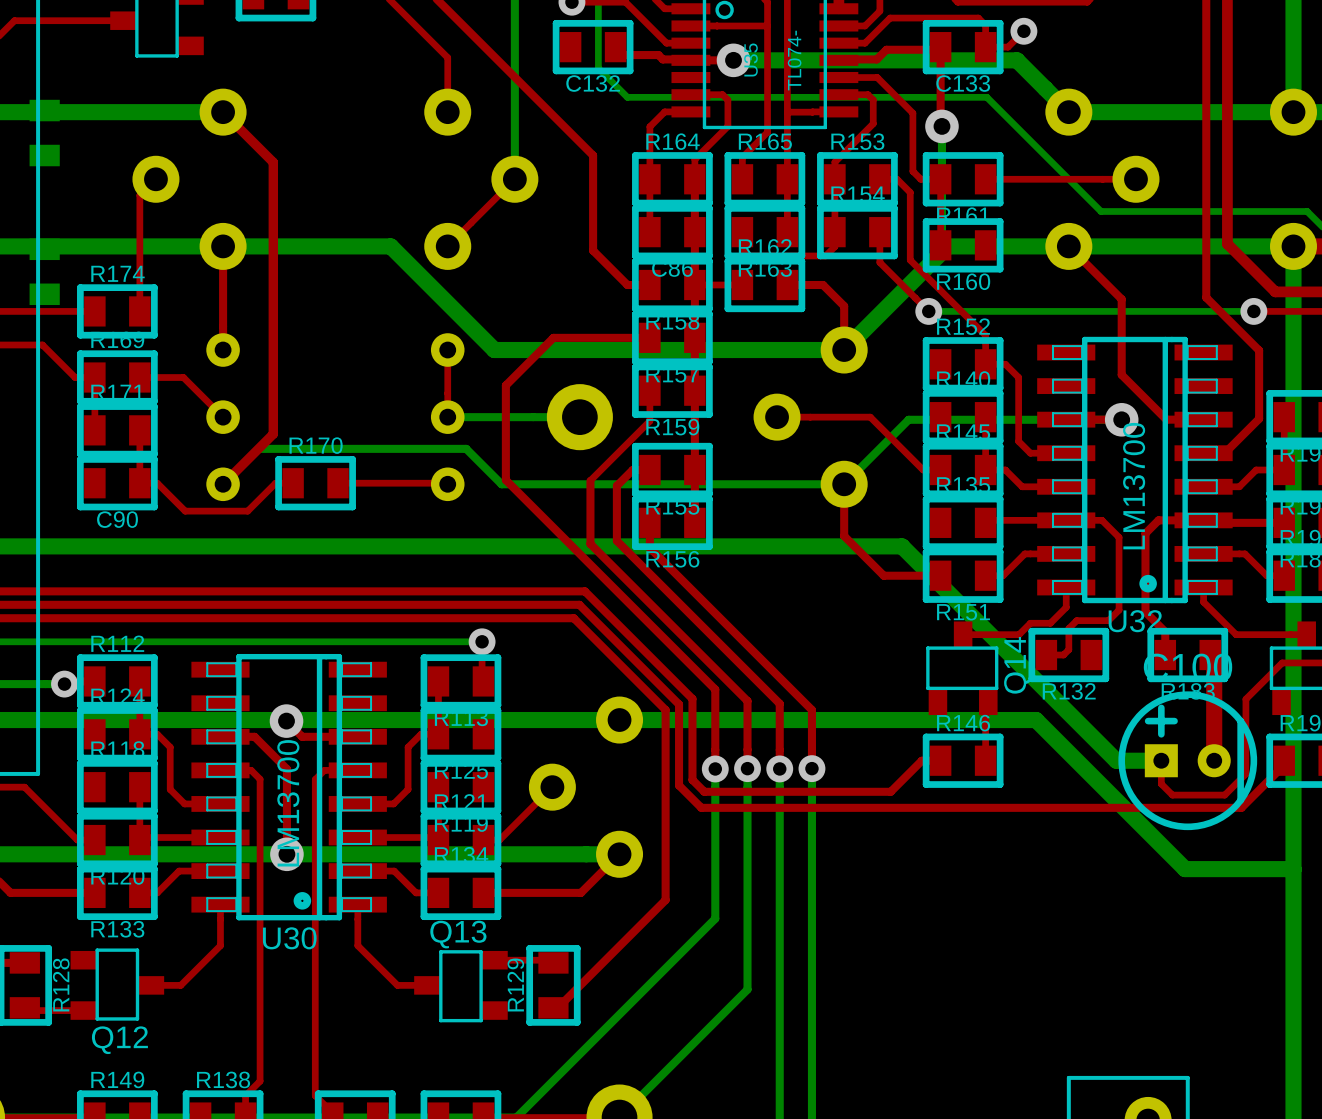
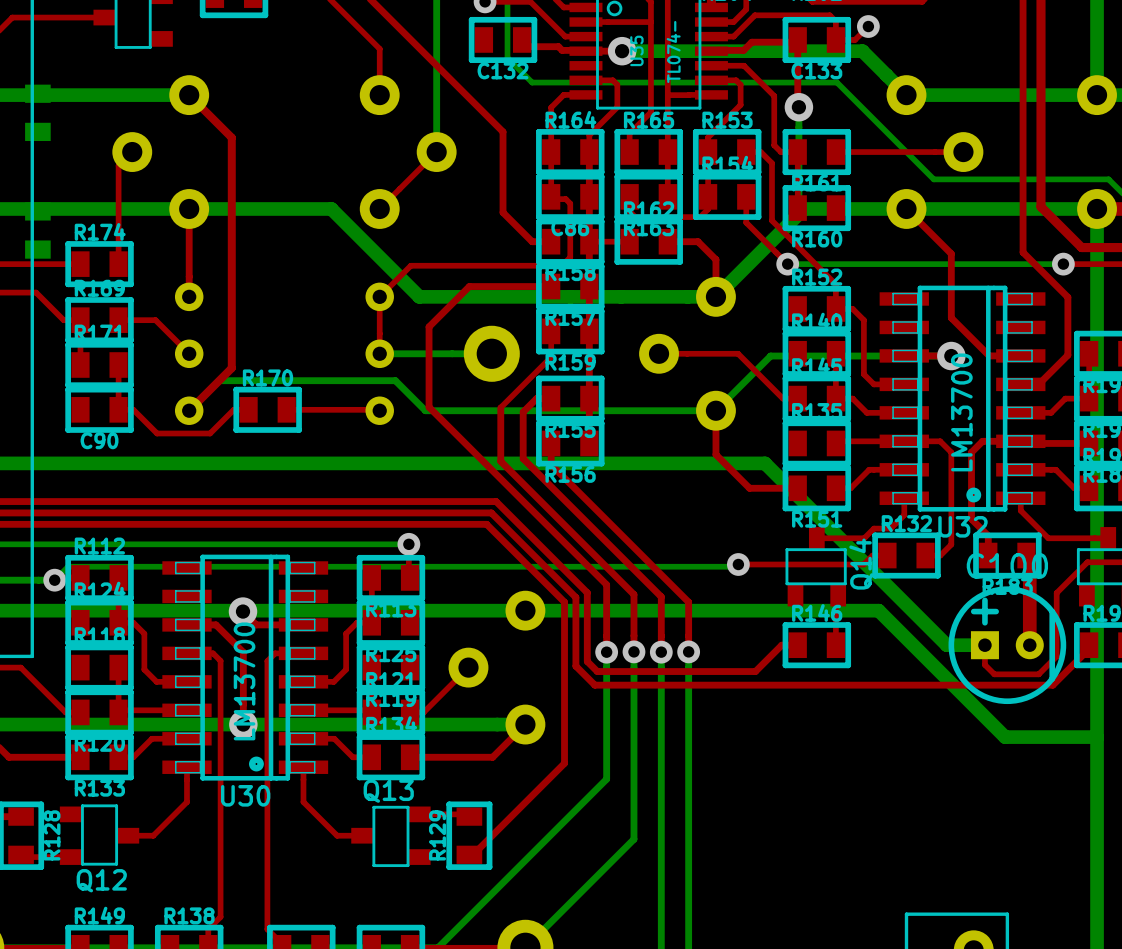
top track: none -> (551, 196) (553, 199) (565, 199) (570, 203) (570, 257) (561, 265) (410, 265) (379, 296)
top track: (1102, 520) (1119, 537) (1119, 610) (1108, 620) (1076, 620) (1068, 628) (1068, 649) (1063, 655) (1046, 655) -> (934, 441) (940, 441) (951, 452) (951, 544) (940, 555) (925, 555)
top track: none -> (887, 555) (872, 555) (863, 564) (738, 564)
bottom track: none -> (738, 564) (736, 566) (68, 566) (54, 580)
via: none -> (738, 564)
R132 name position: R132 (1069, 691) -> R132 (906, 523)

